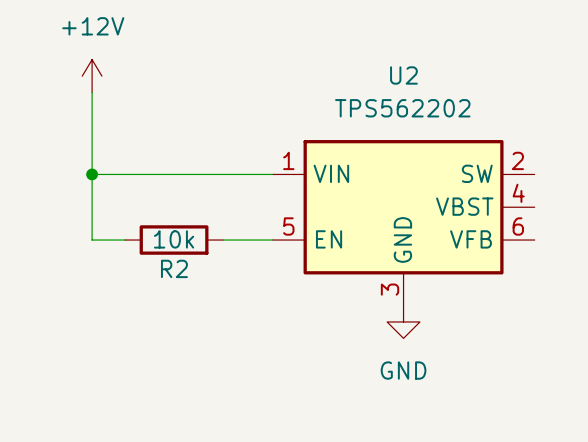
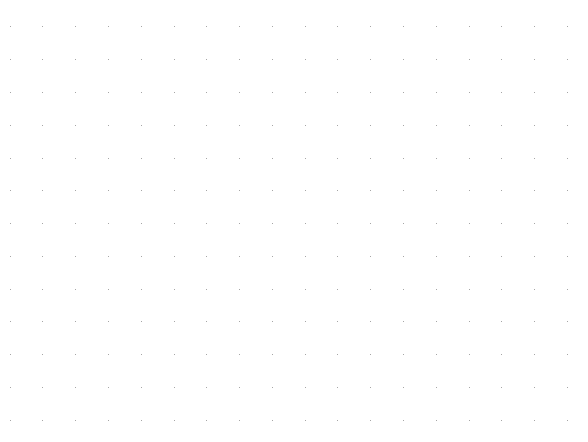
power symbol: +12V (92, 76) -> none
wire: (92, 92) (92, 240) (124, 240) -> none
wire: (92, 174) (272, 174) -> none
junction: (92, 174) -> none
U2: TPS562202 (403, 222) -> none
R2: 10k (174, 240) -> none
wire: (223, 240) (272, 240) -> none
power symbol: GND (403, 321) -> none

